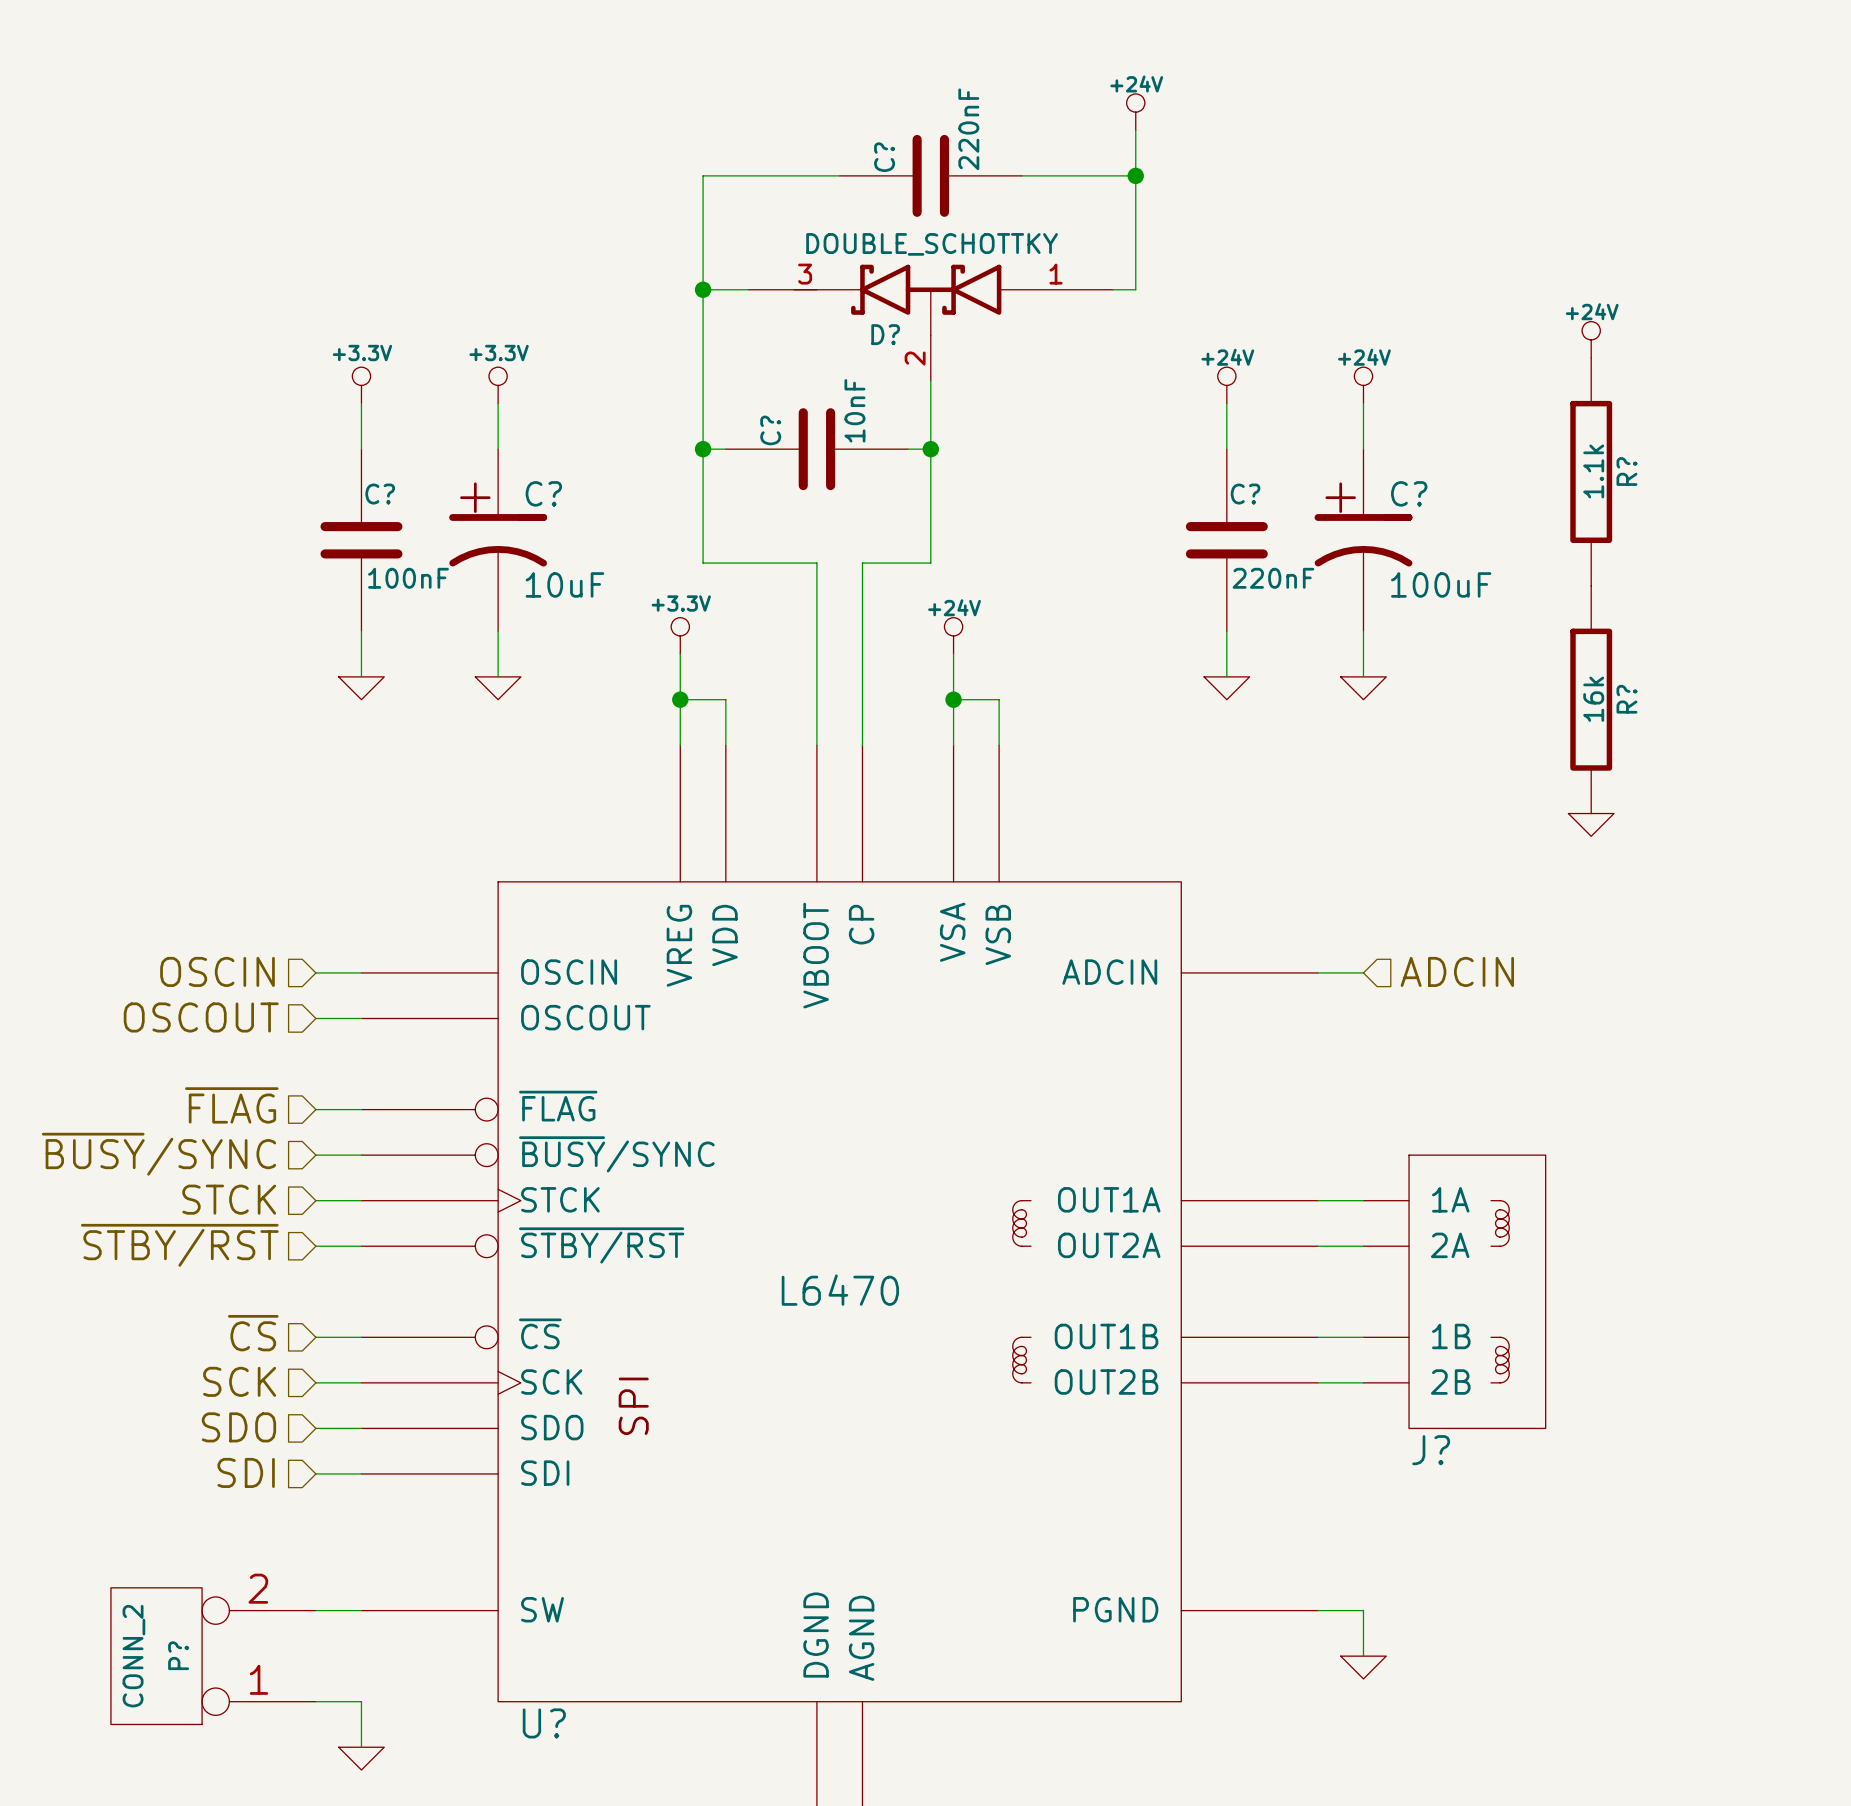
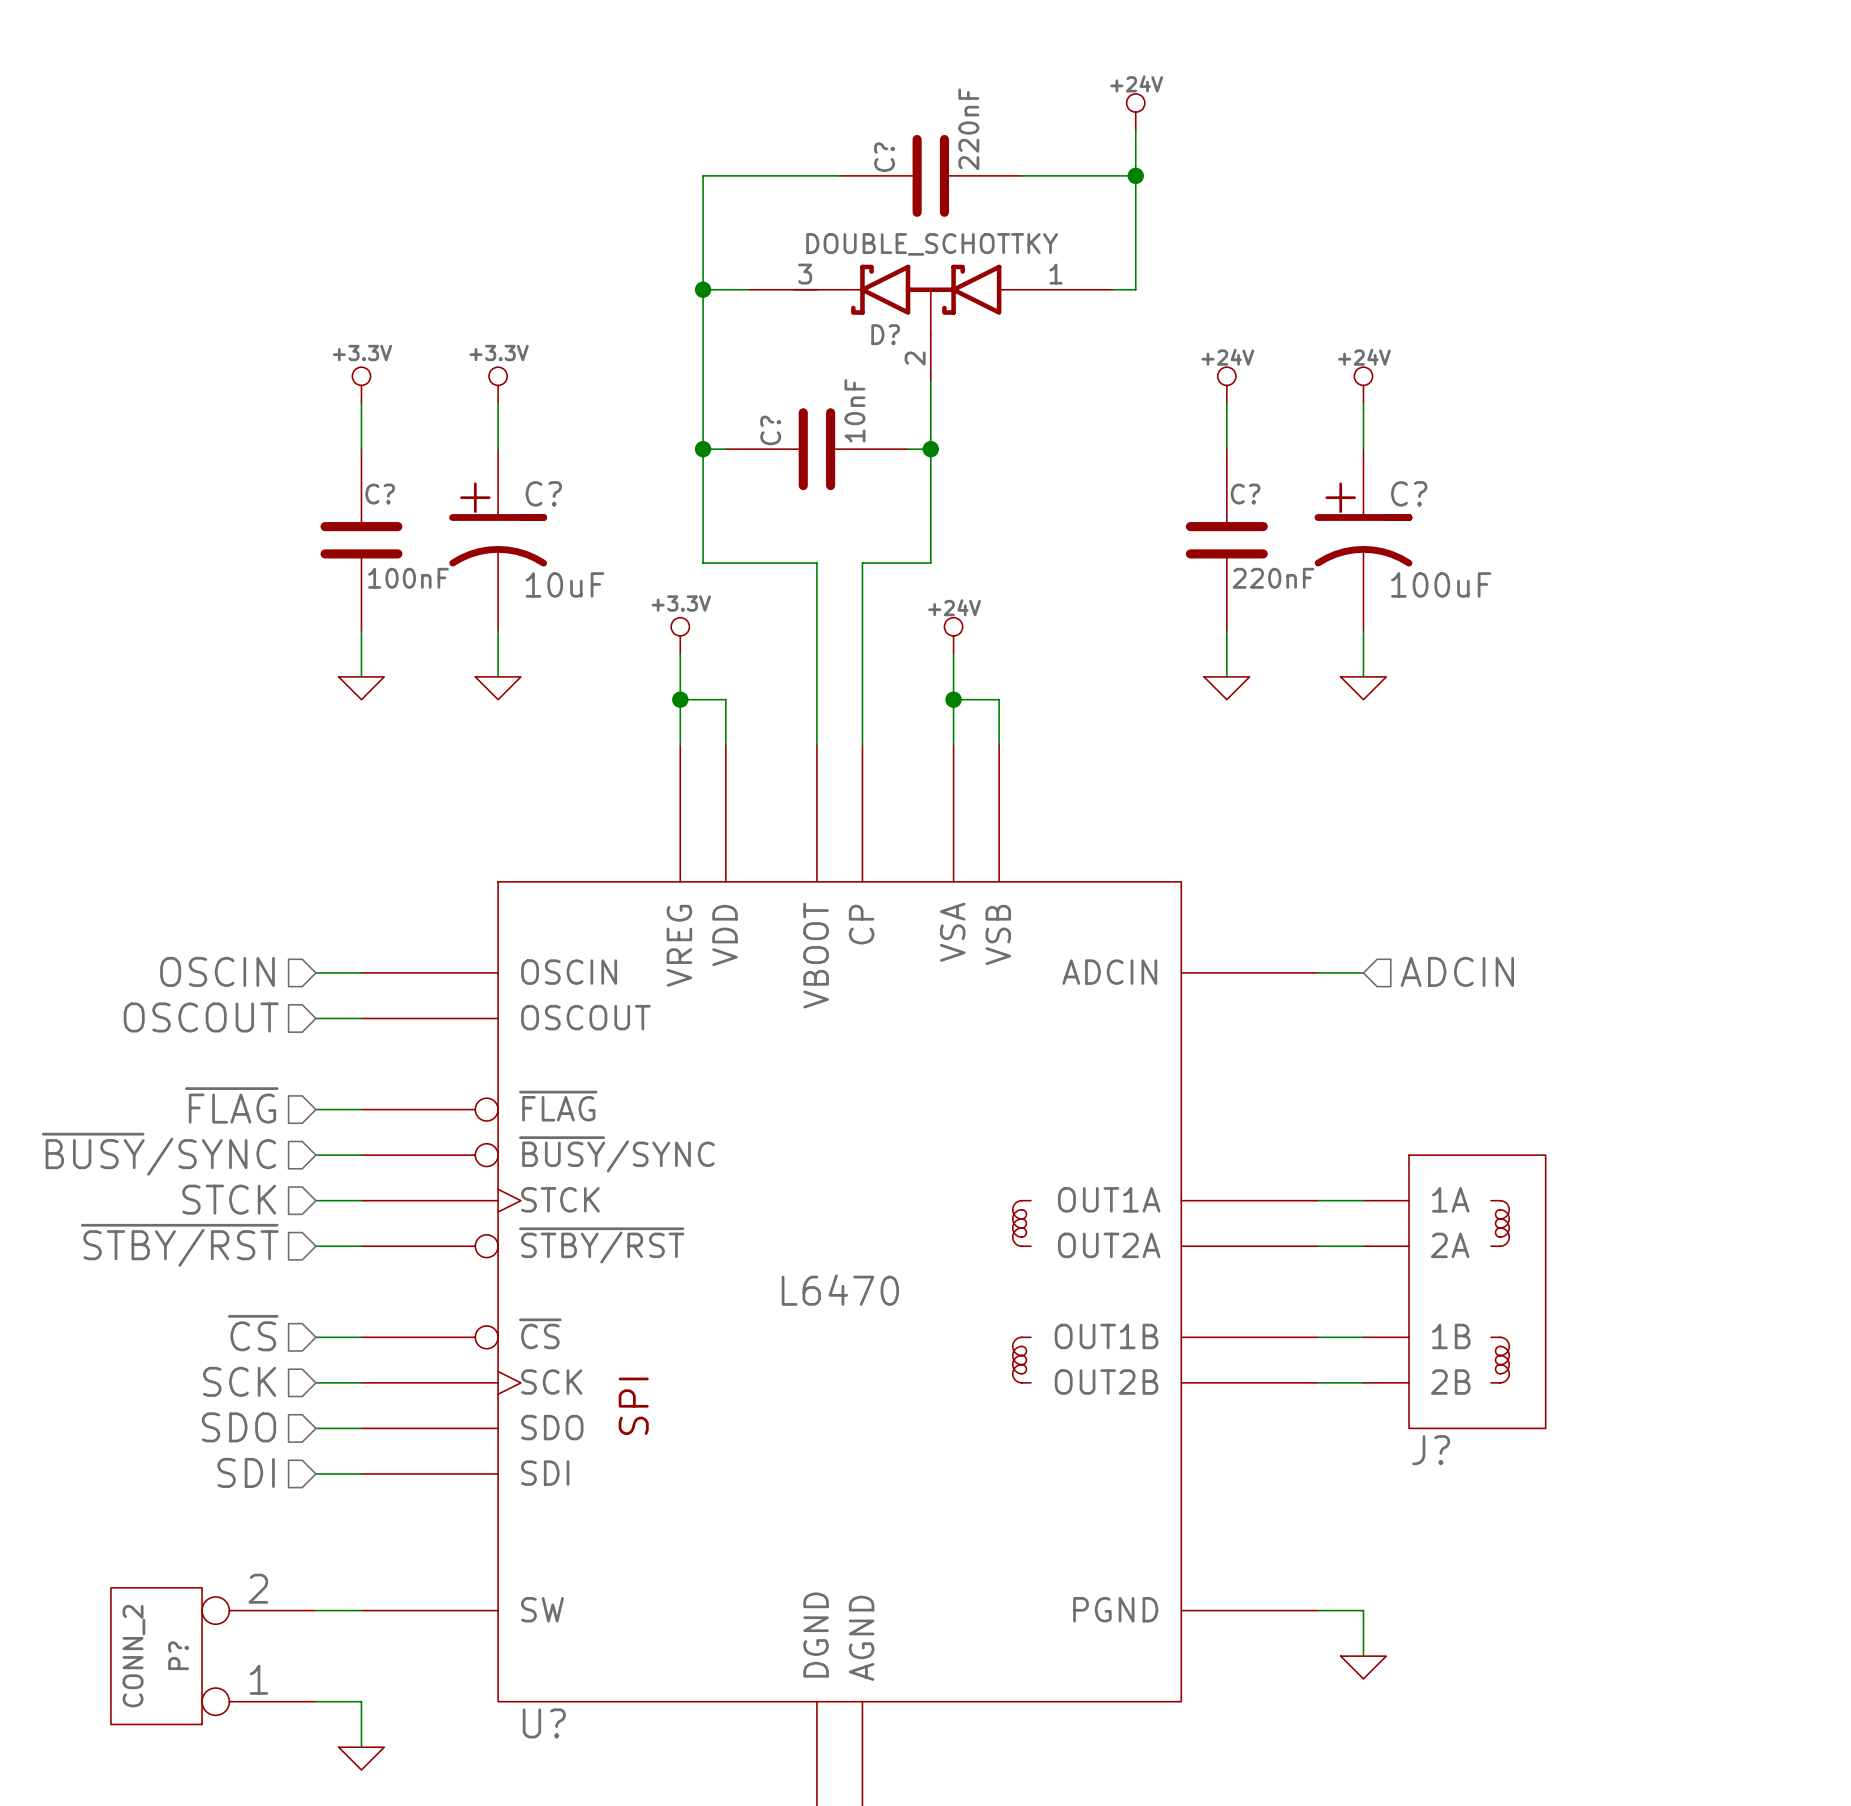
power symbol: +24V (1591, 339) -> none
R?: 1.1k (1591, 471) -> none
R?: 16k (1591, 699) -> none
power symbol: (1591, 824) -> none

